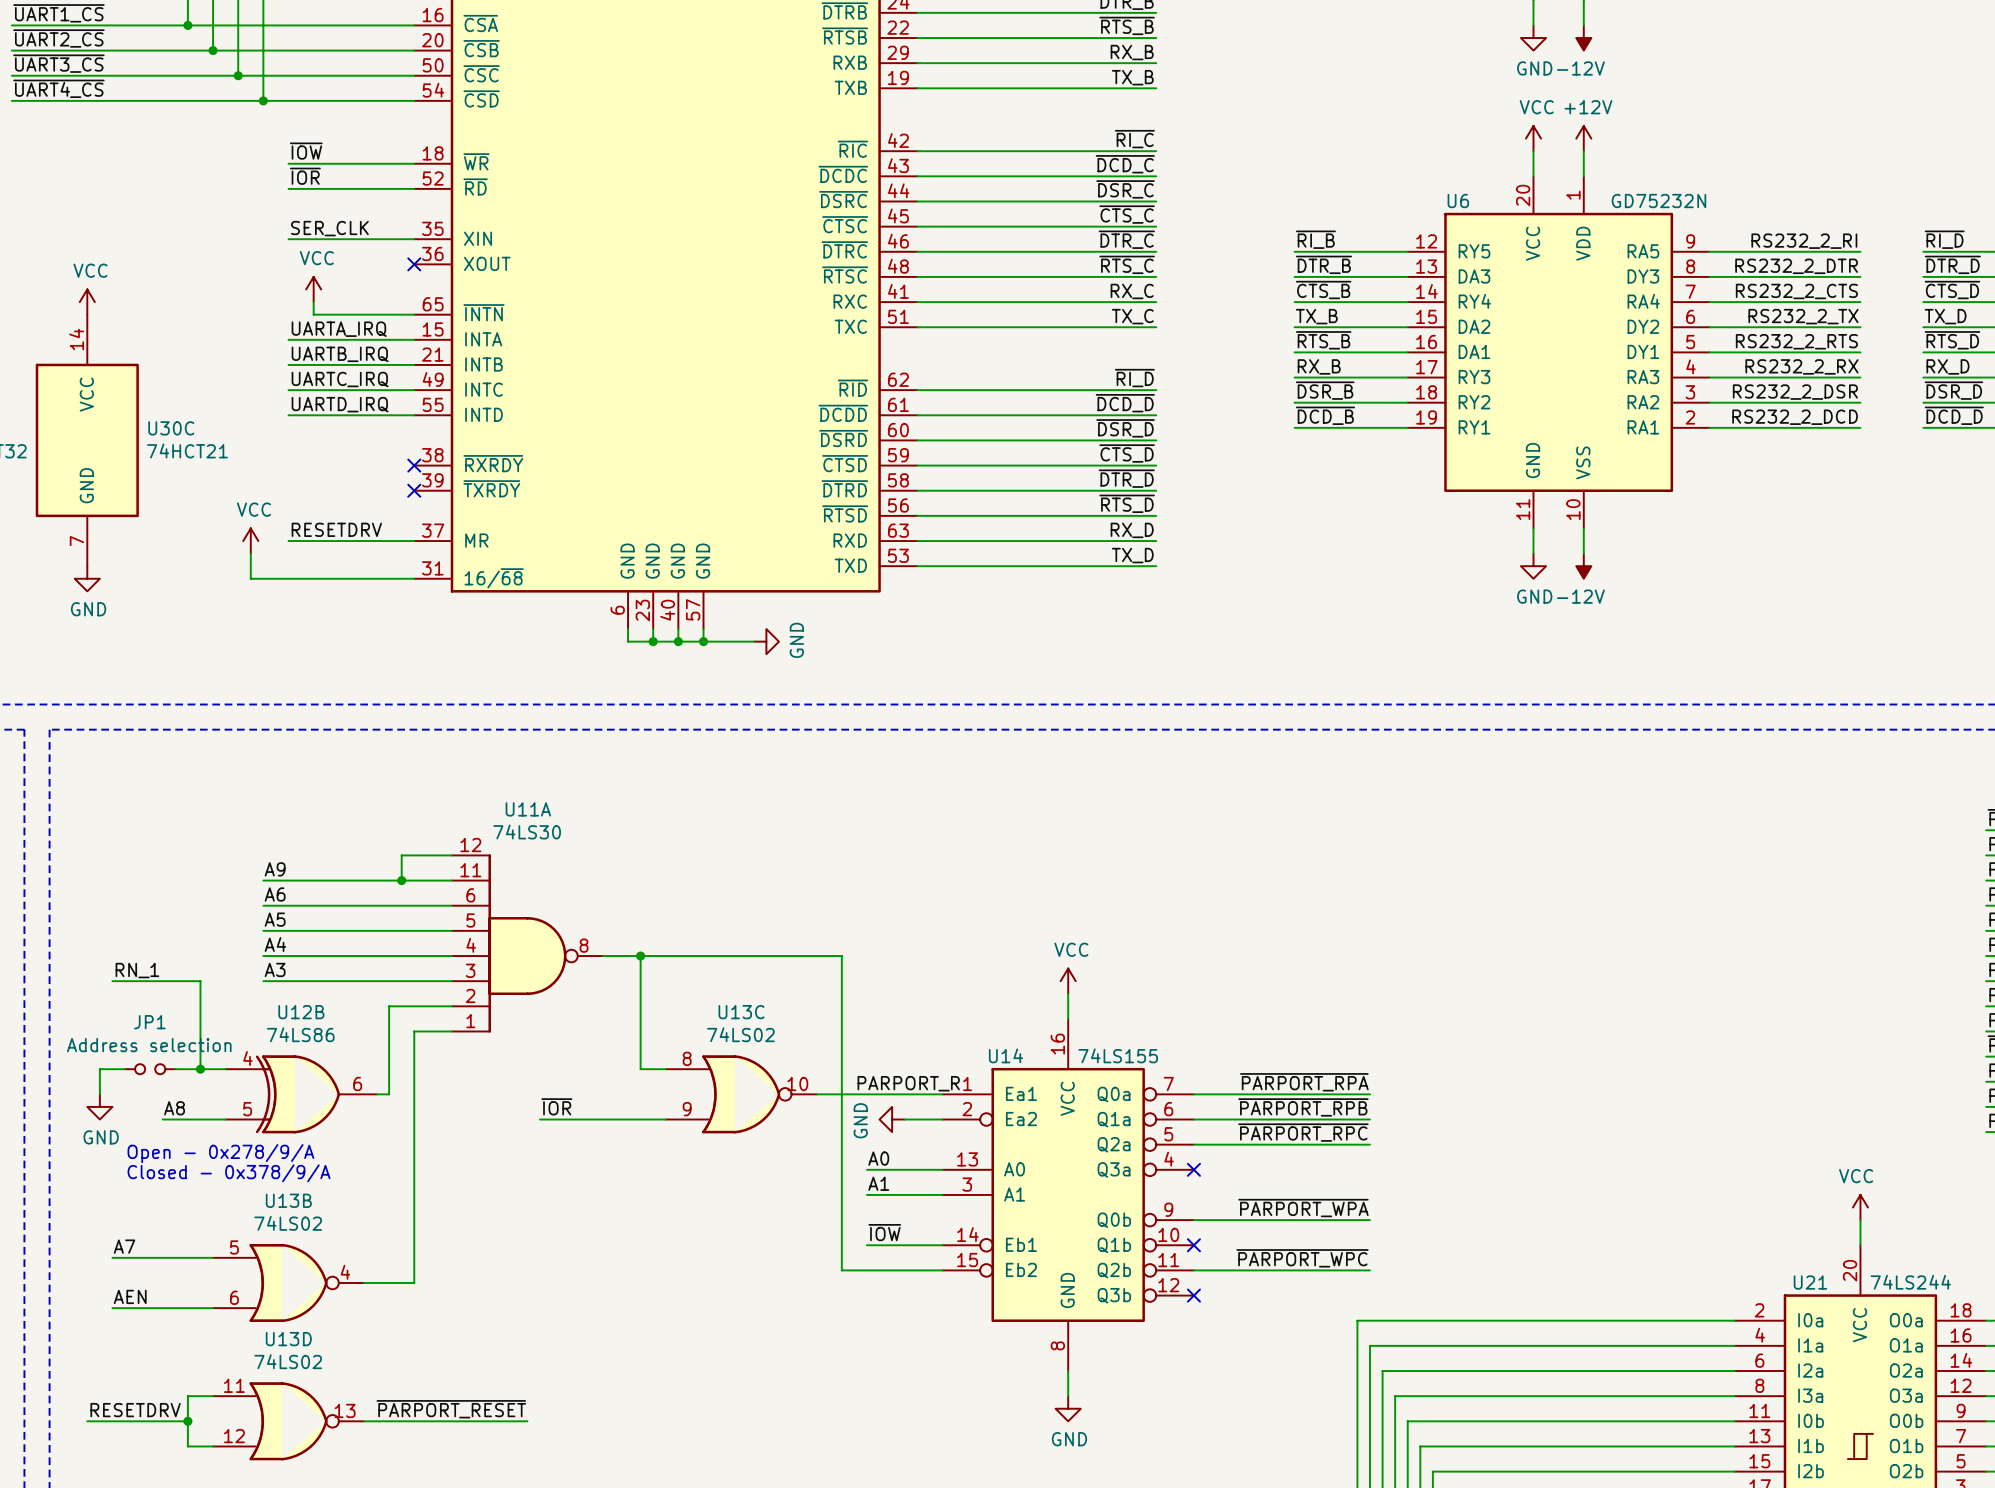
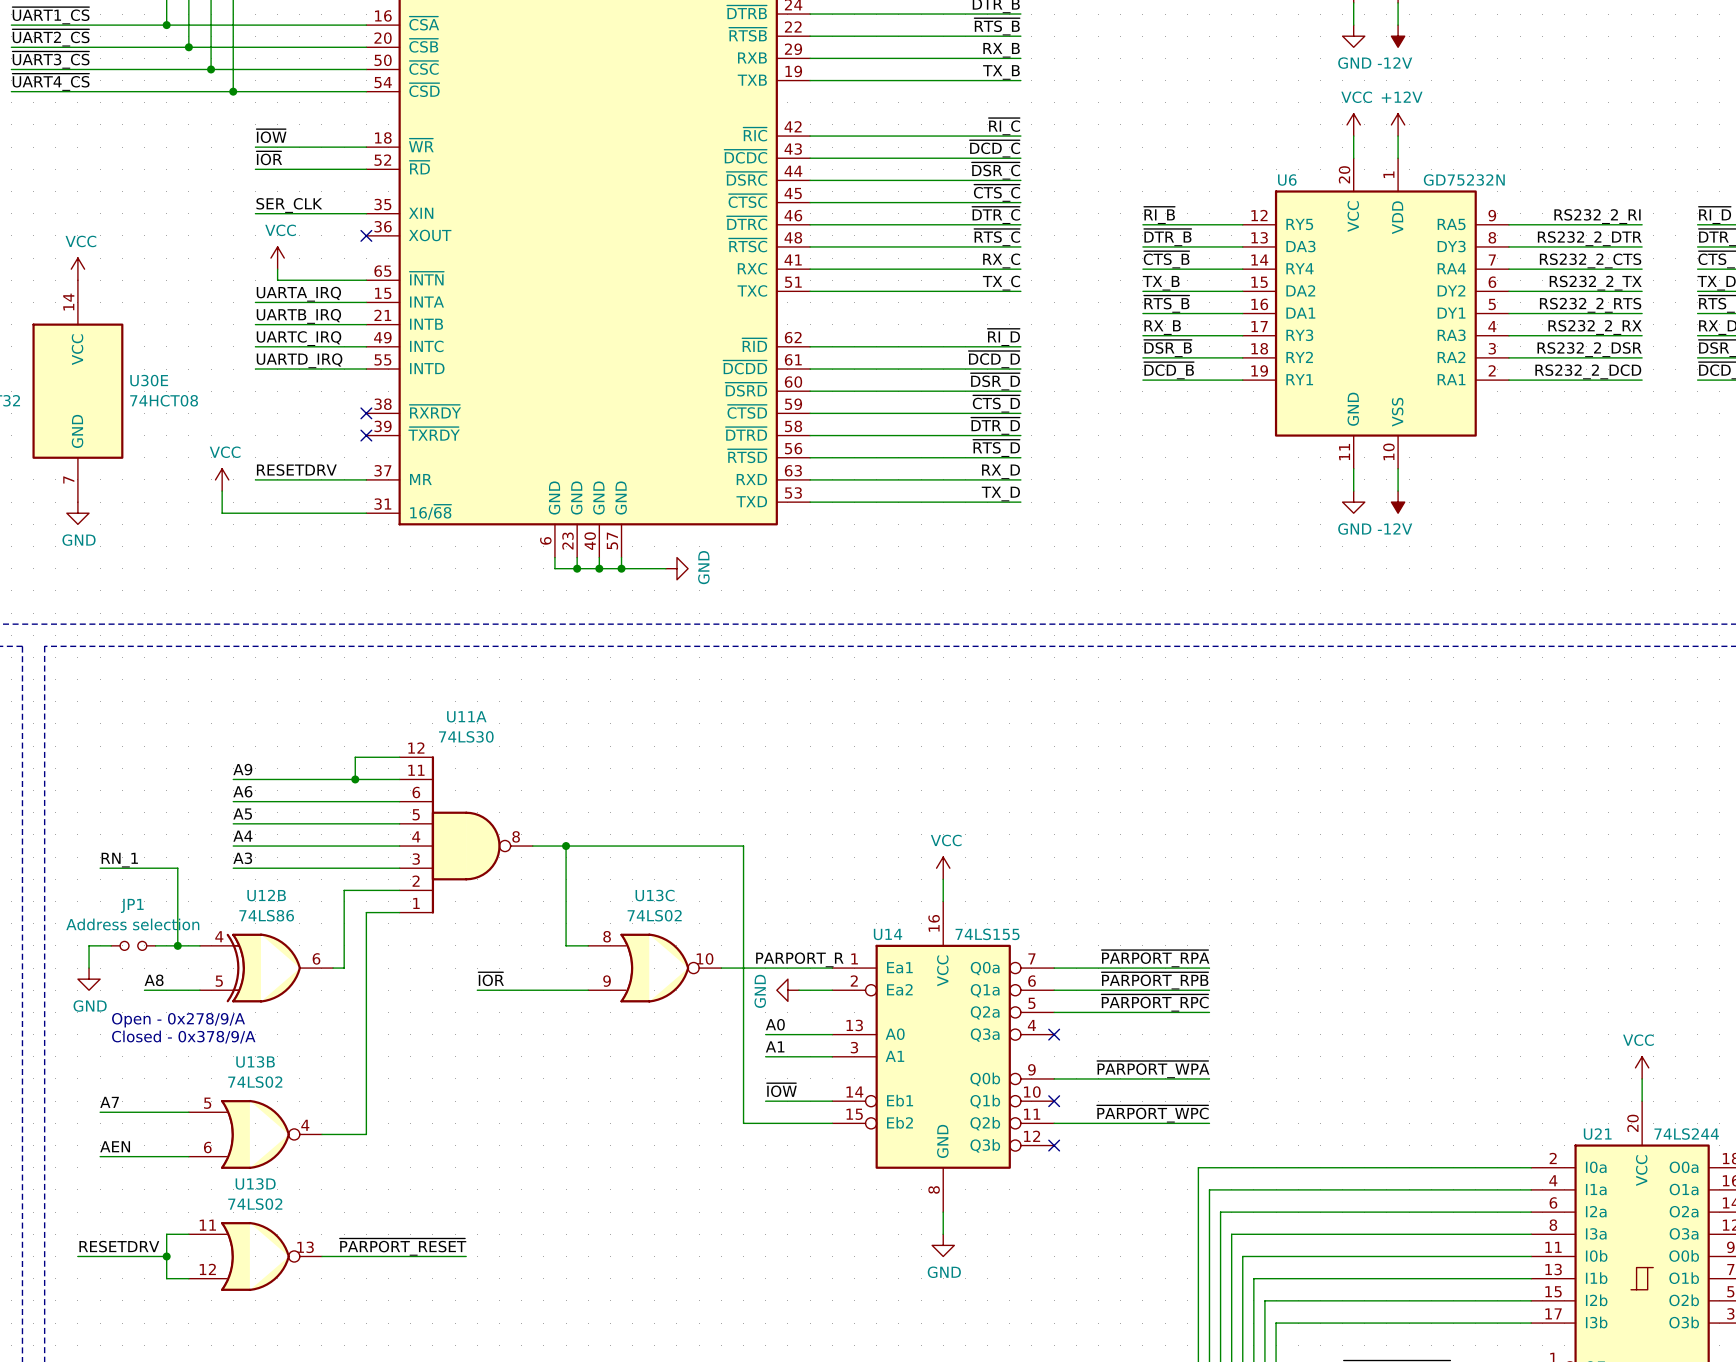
U30C name: U30C (171, 428) -> U30E (149, 380)
U30C value: 74HCT21 (187, 450) -> 74HCT08 (164, 400)

